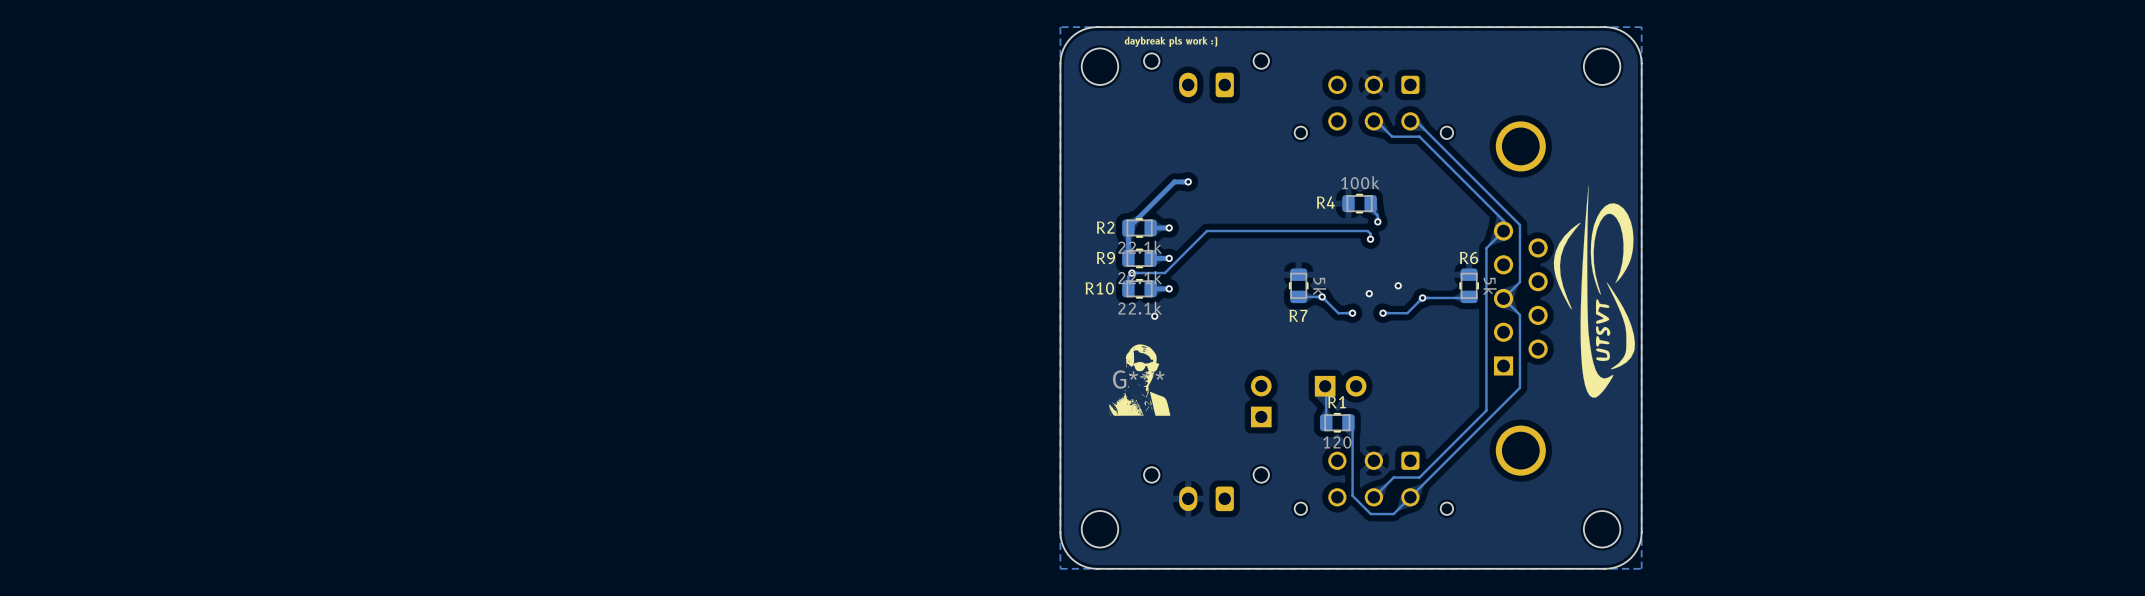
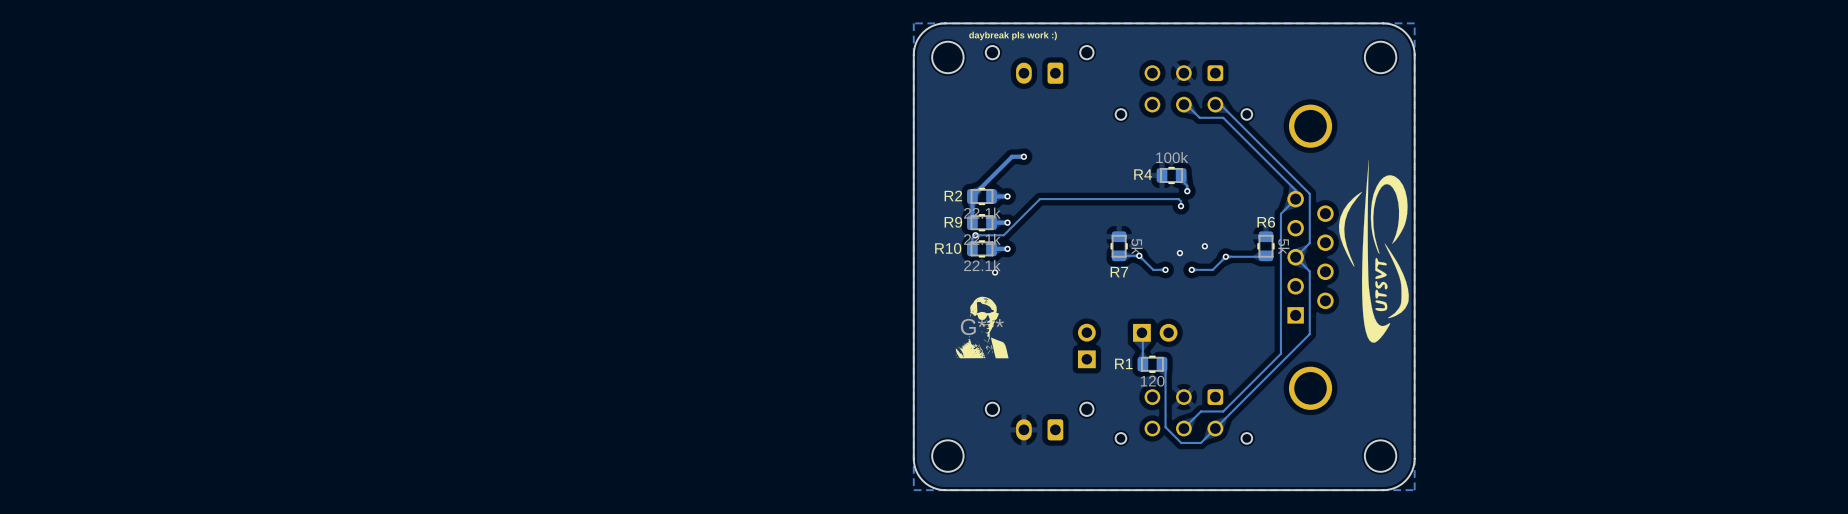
R1 name position: R1 (1336, 402) -> R1 (1123, 363)

